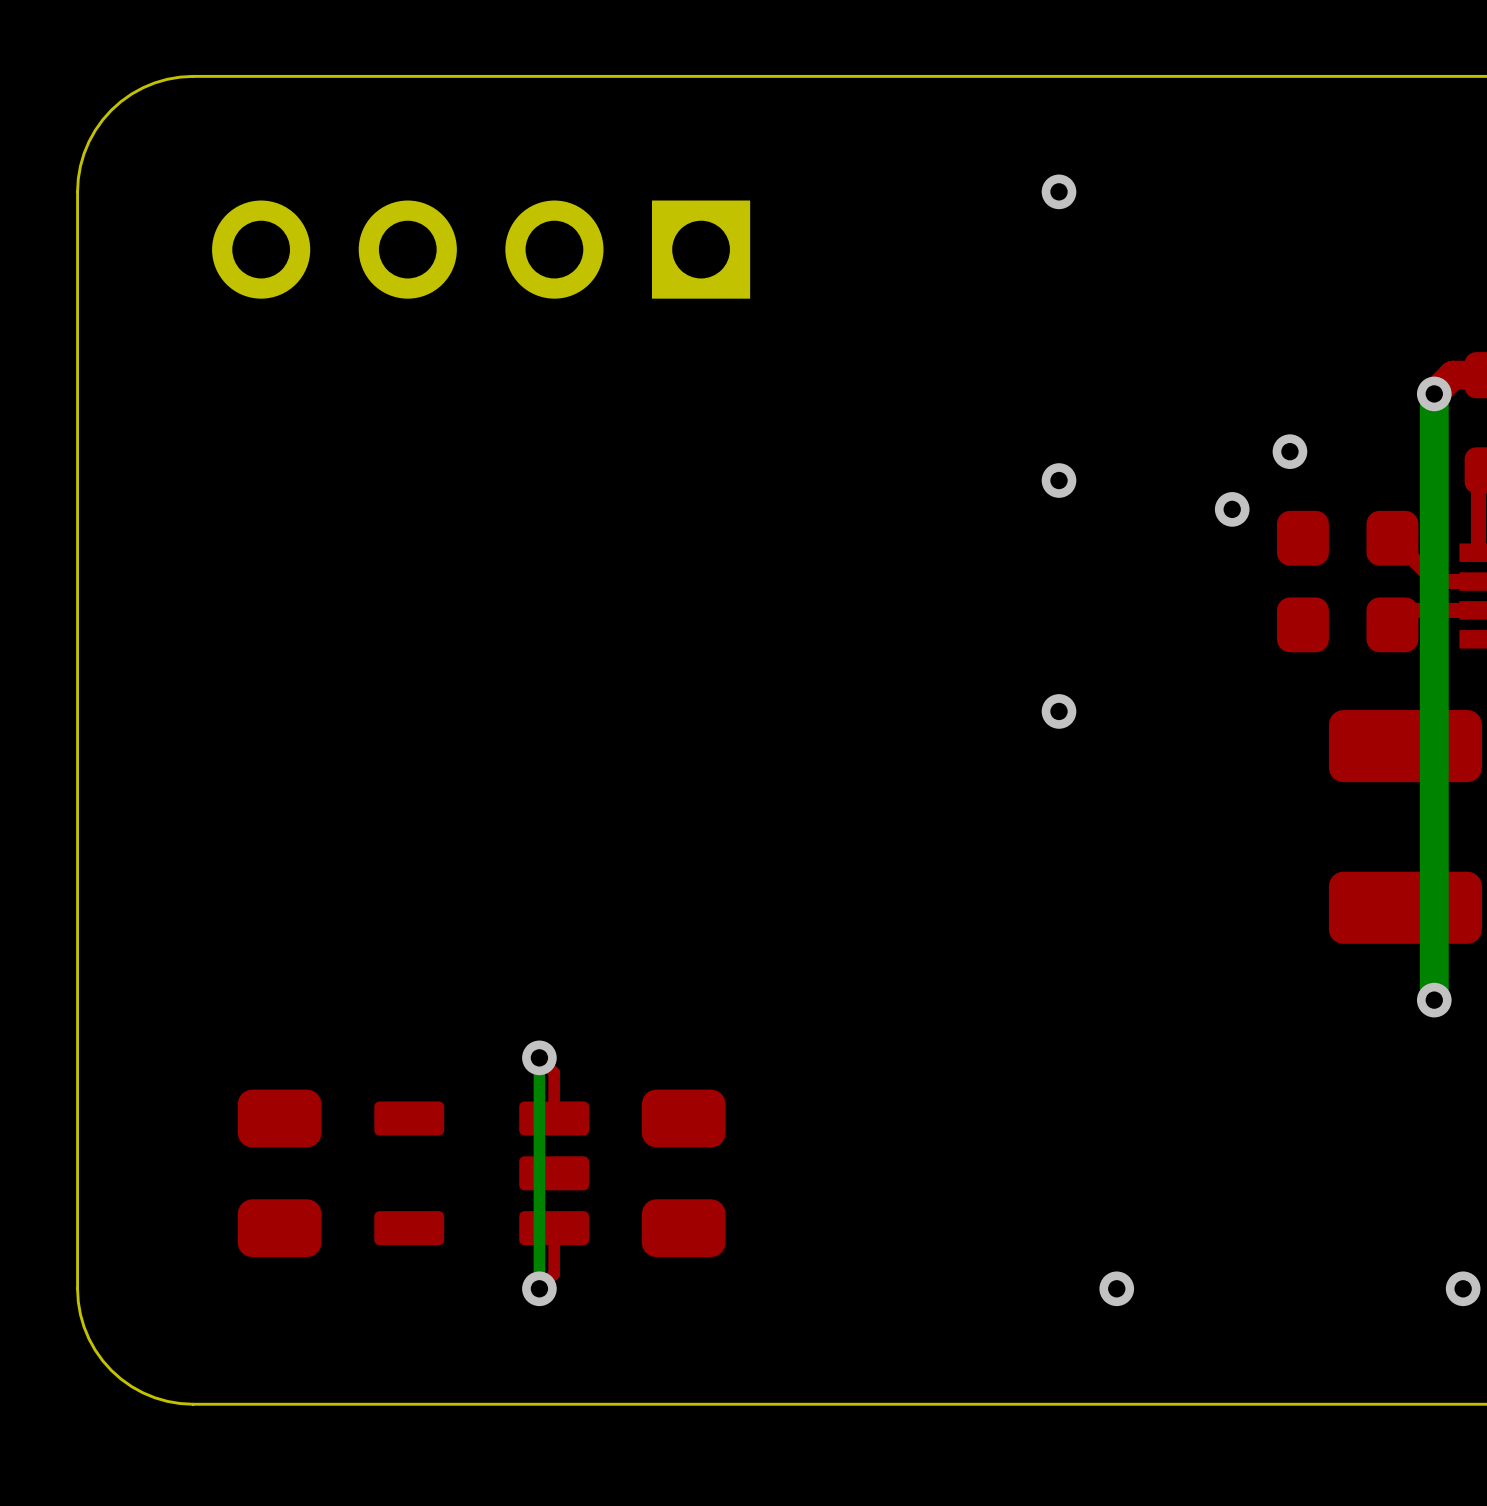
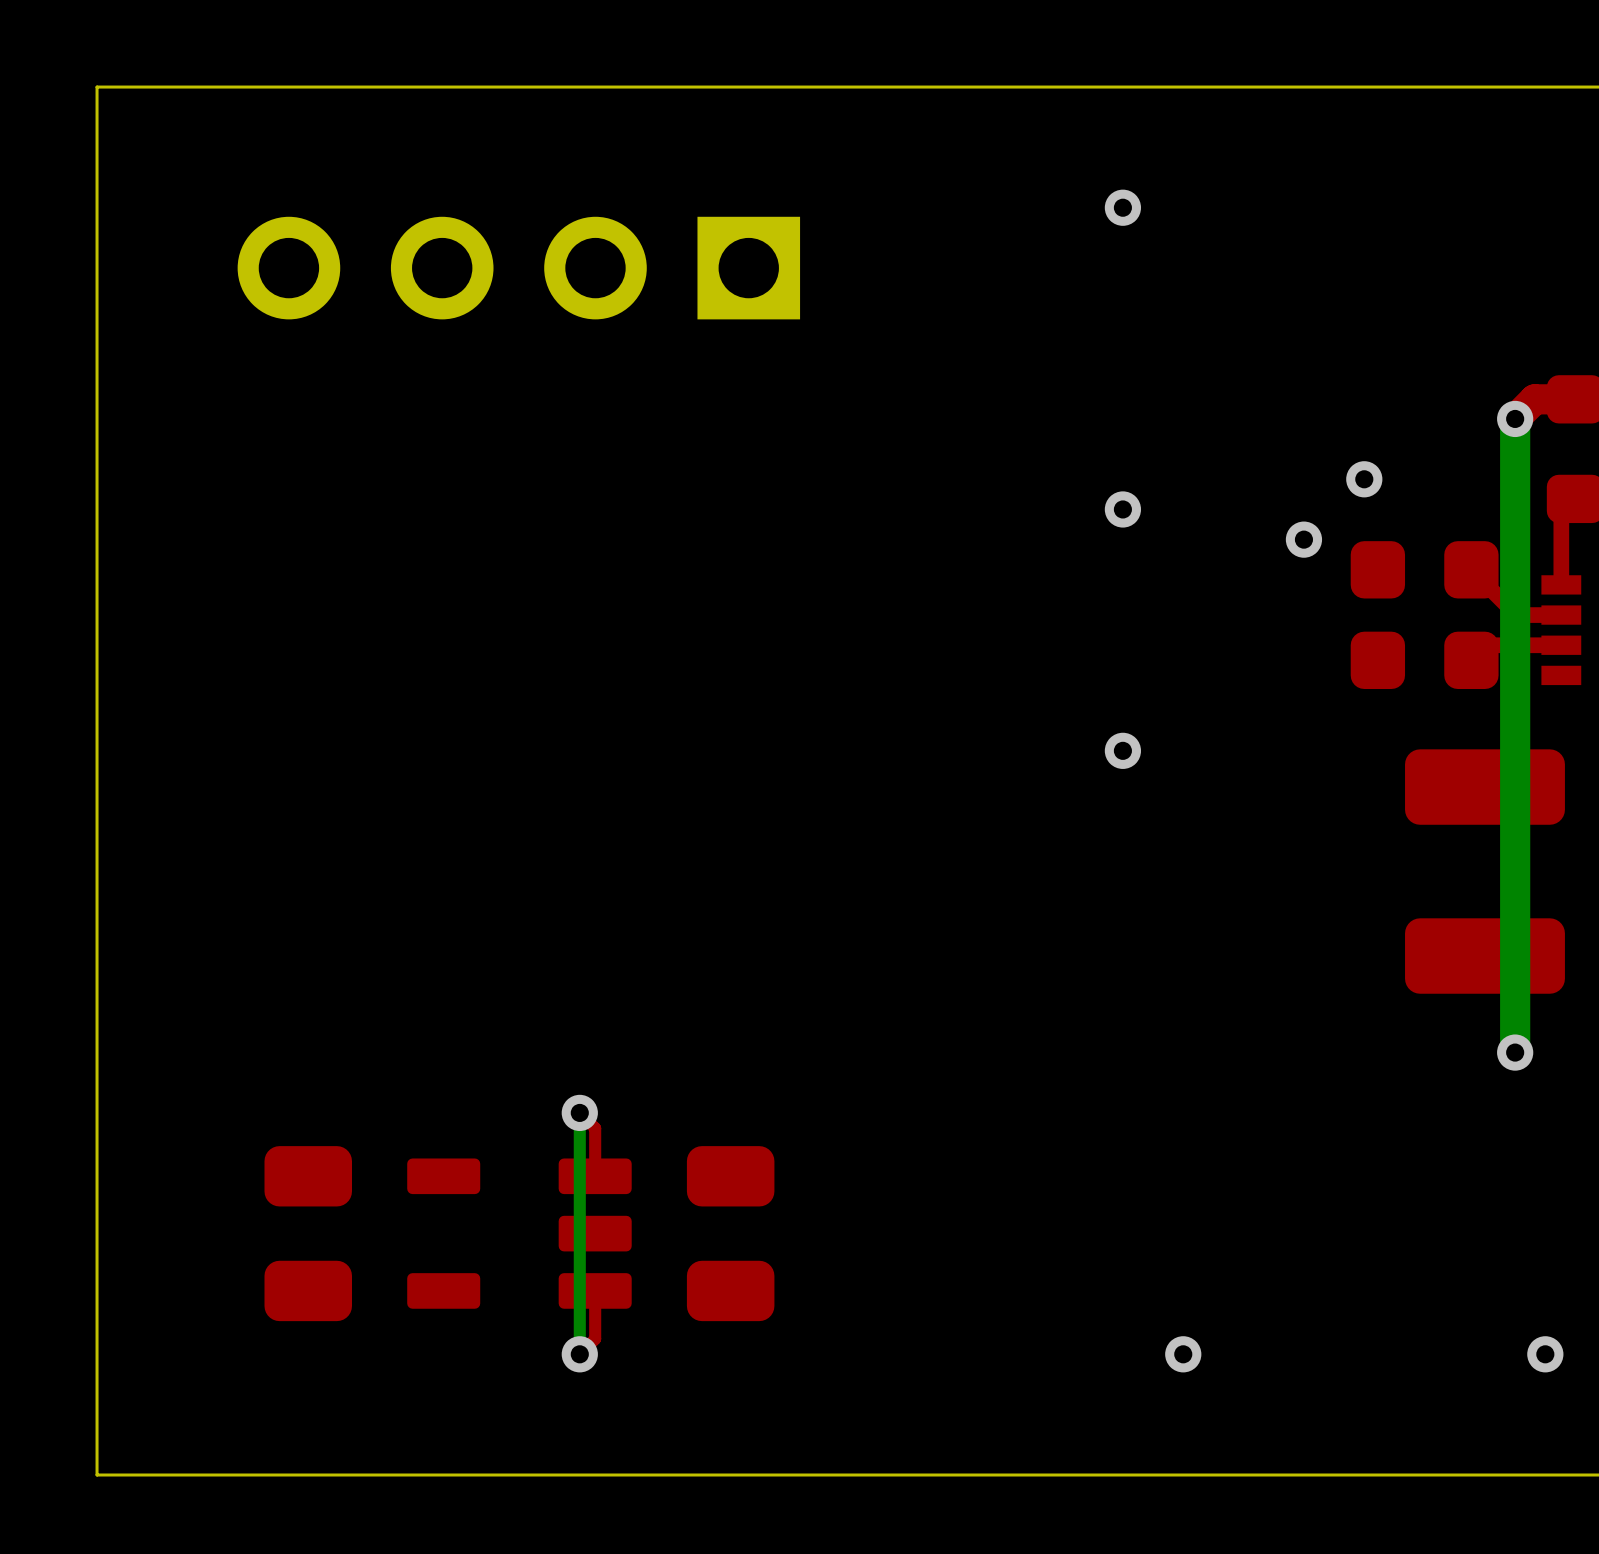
board edge: (193, 76) (167, 79) (142, 87) (111, 110) (95, 130) (84, 153) (77, 191) -> (217, 87) (97, 87) (97, 207)
board edge: (77, 1288) (84, 1326) (95, 1350) (111, 1370) (142, 1392) (167, 1401) (193, 1404) -> (97, 1354) (97, 1475) (217, 1475)

